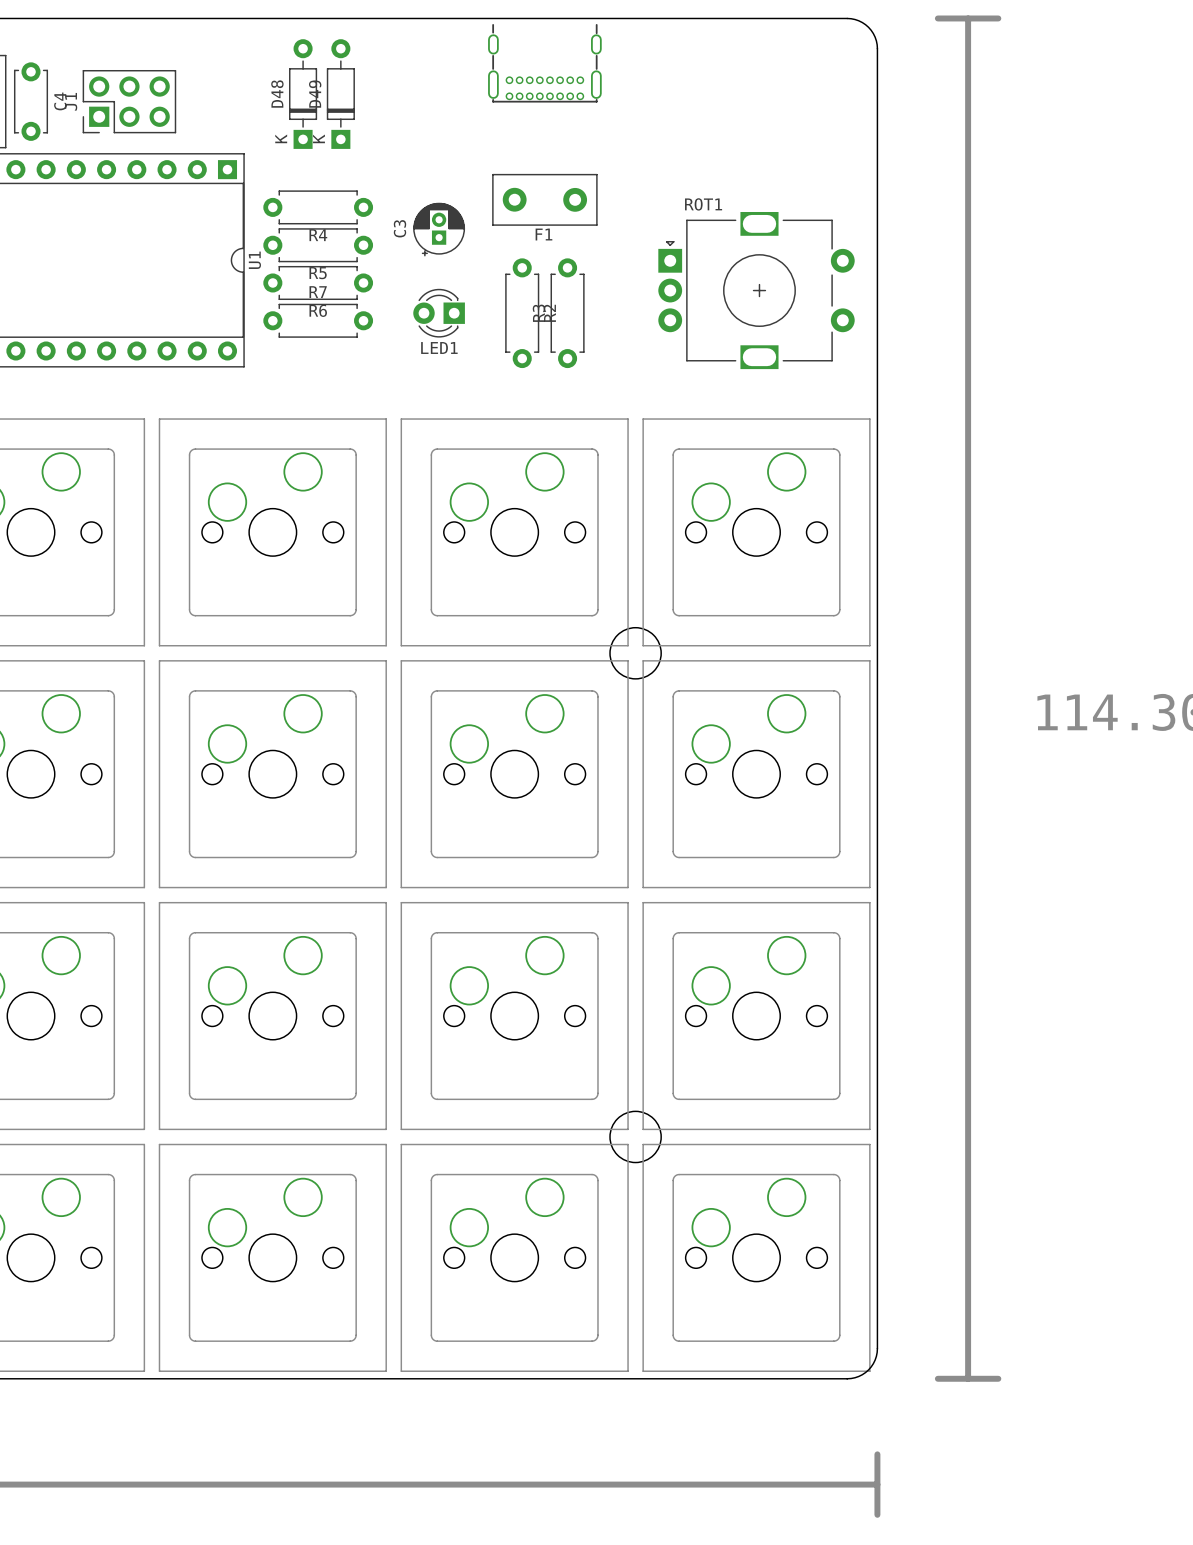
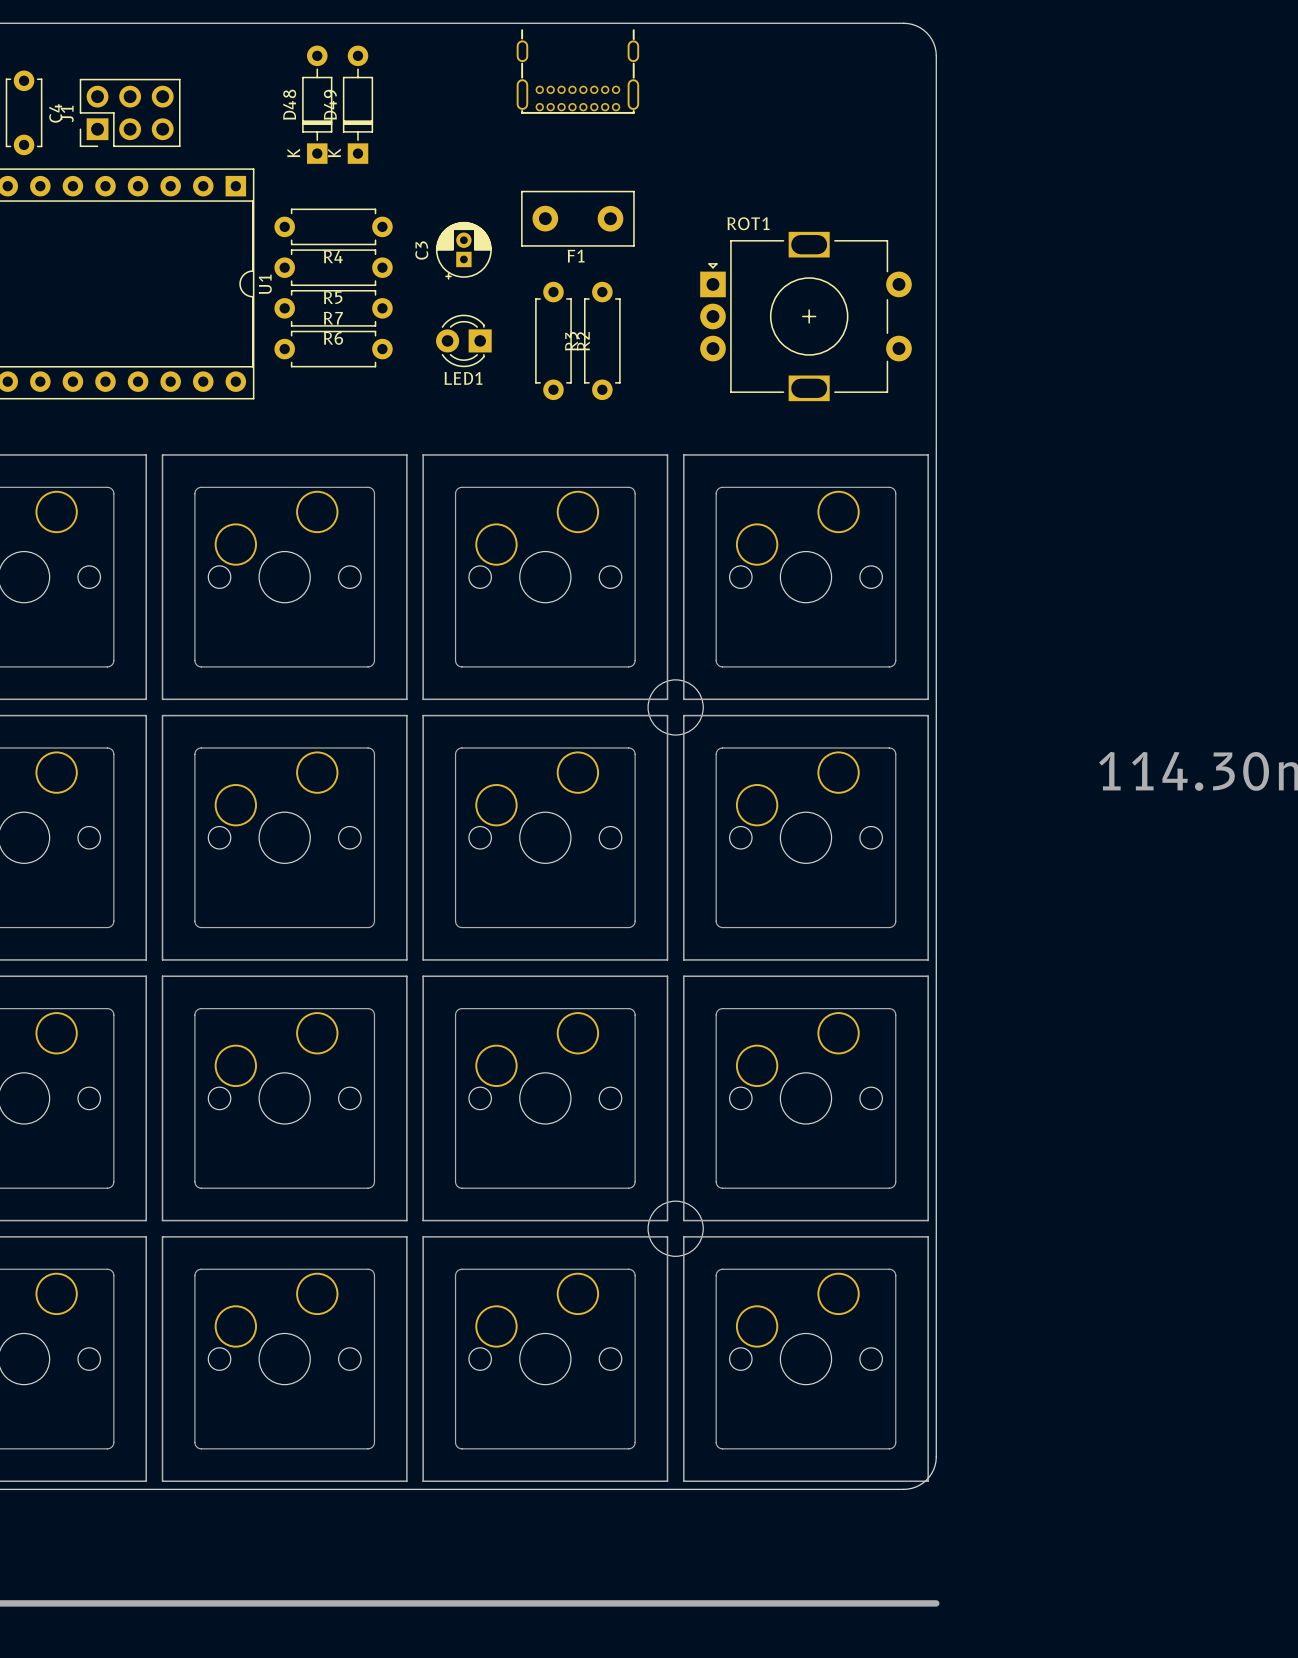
line: (937, 18) (998, 18) -> none
line: (968, 18) (968, 1378) -> none
line: (937, 1378) (998, 1378) -> none
line: (877, 1454) (877, 1514) -> none

